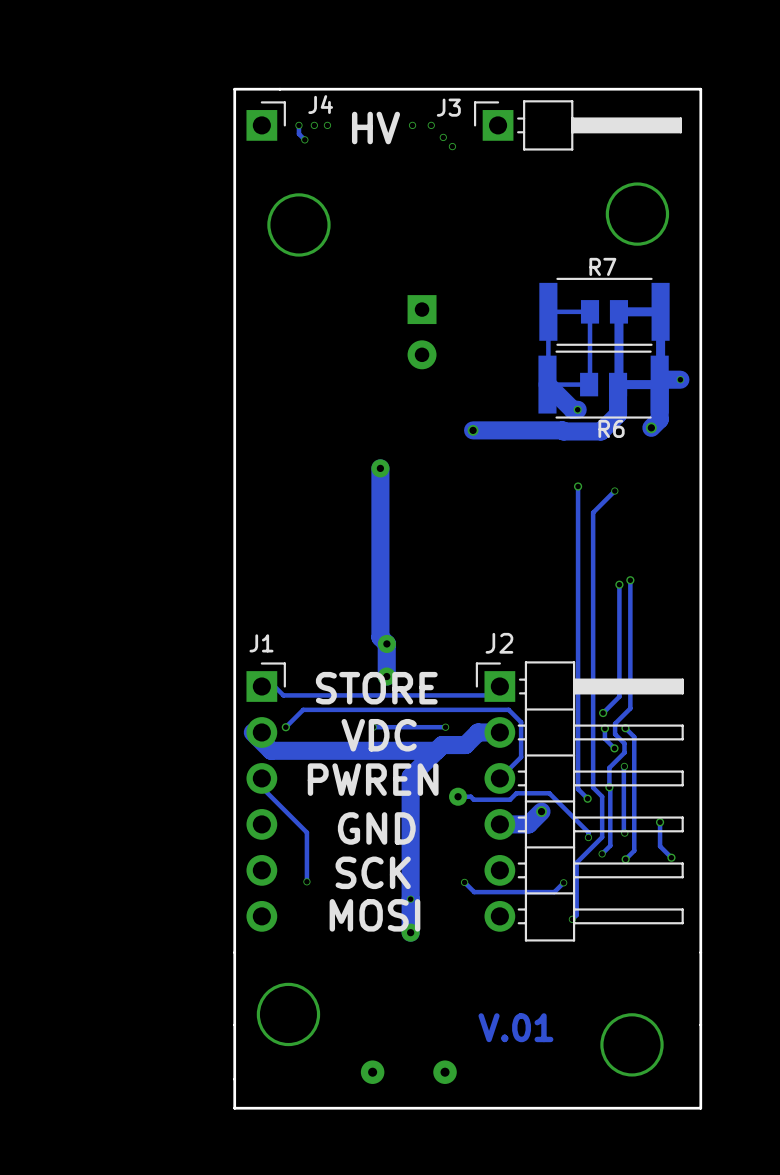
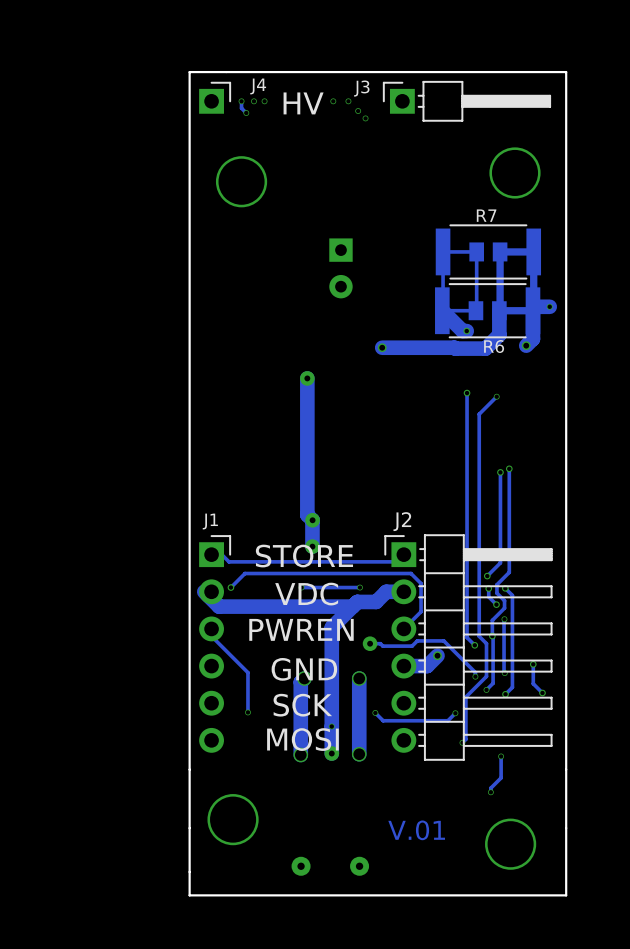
track: none -> (304, 678) (300, 682) (300, 754)
via: none -> (304, 678)
track: none -> (359, 678) (359, 754)
via: none -> (359, 678)
via: none -> (359, 754)
via: none -> (300, 754)
track: none -> (501, 756) (501, 777) (490, 788) (490, 792)
via: none -> (501, 756)
via: none -> (490, 792)

